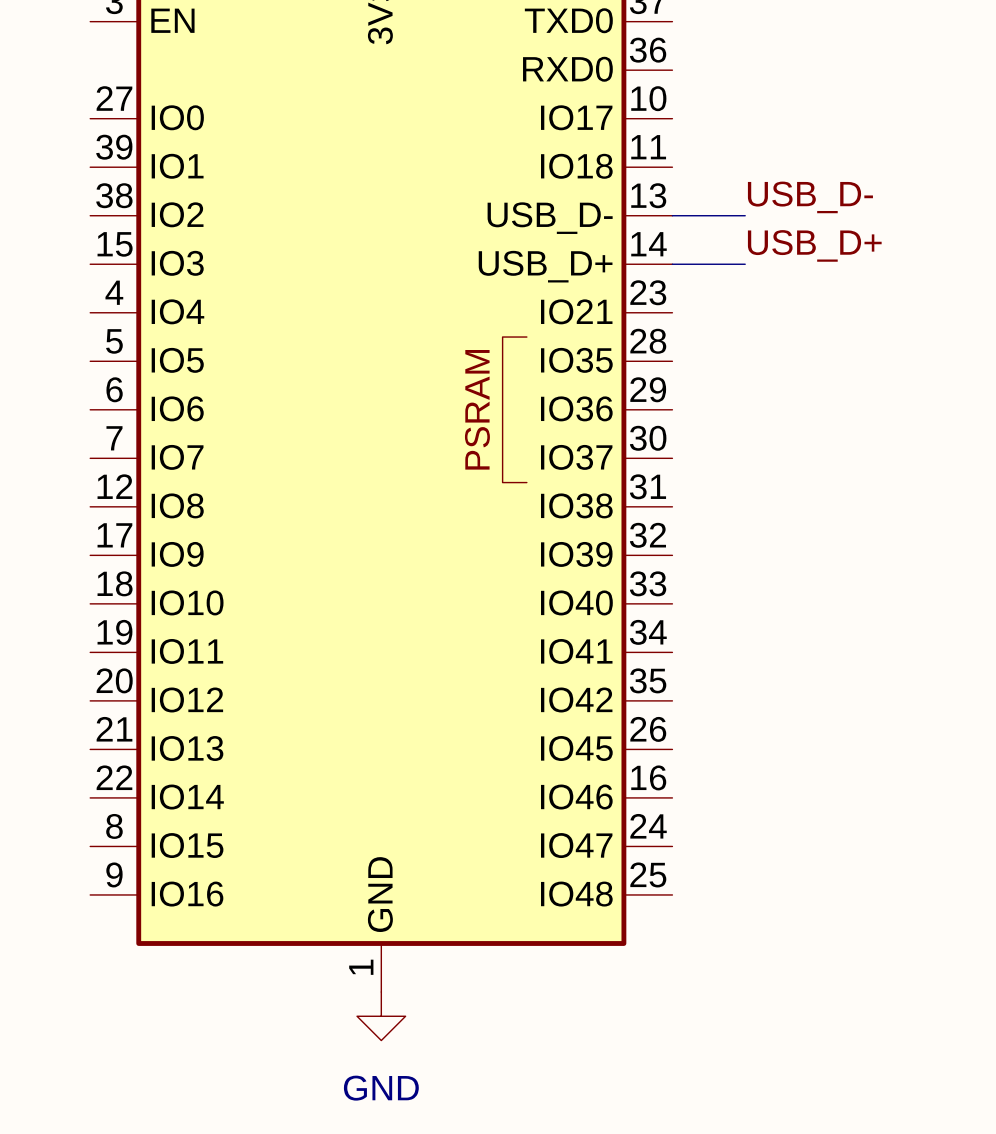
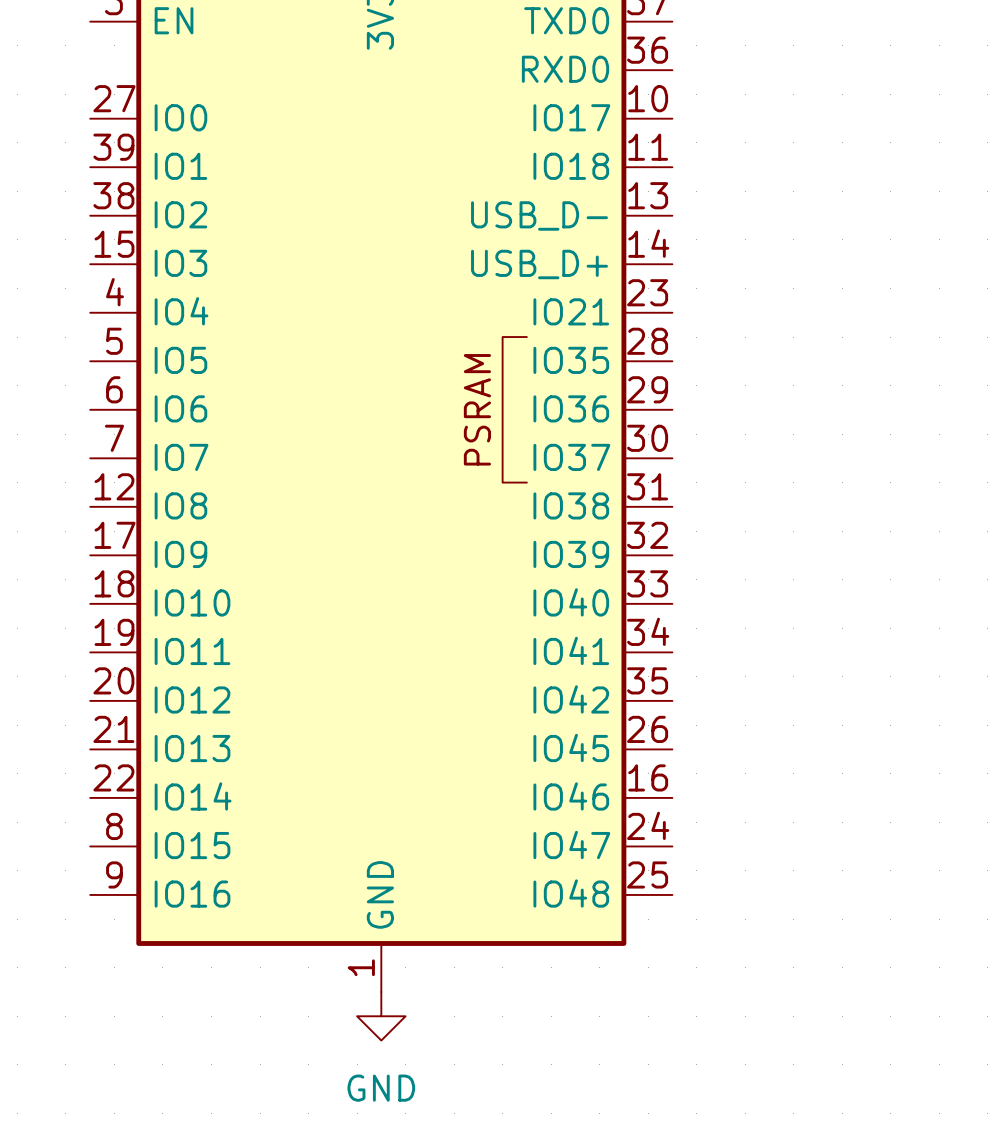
label: USB_D- (810, 197) -> none
wire: (672, 215) (745, 215) -> none
label: USB_D+ (814, 245) -> none
wire: (672, 264) (745, 264) -> none

